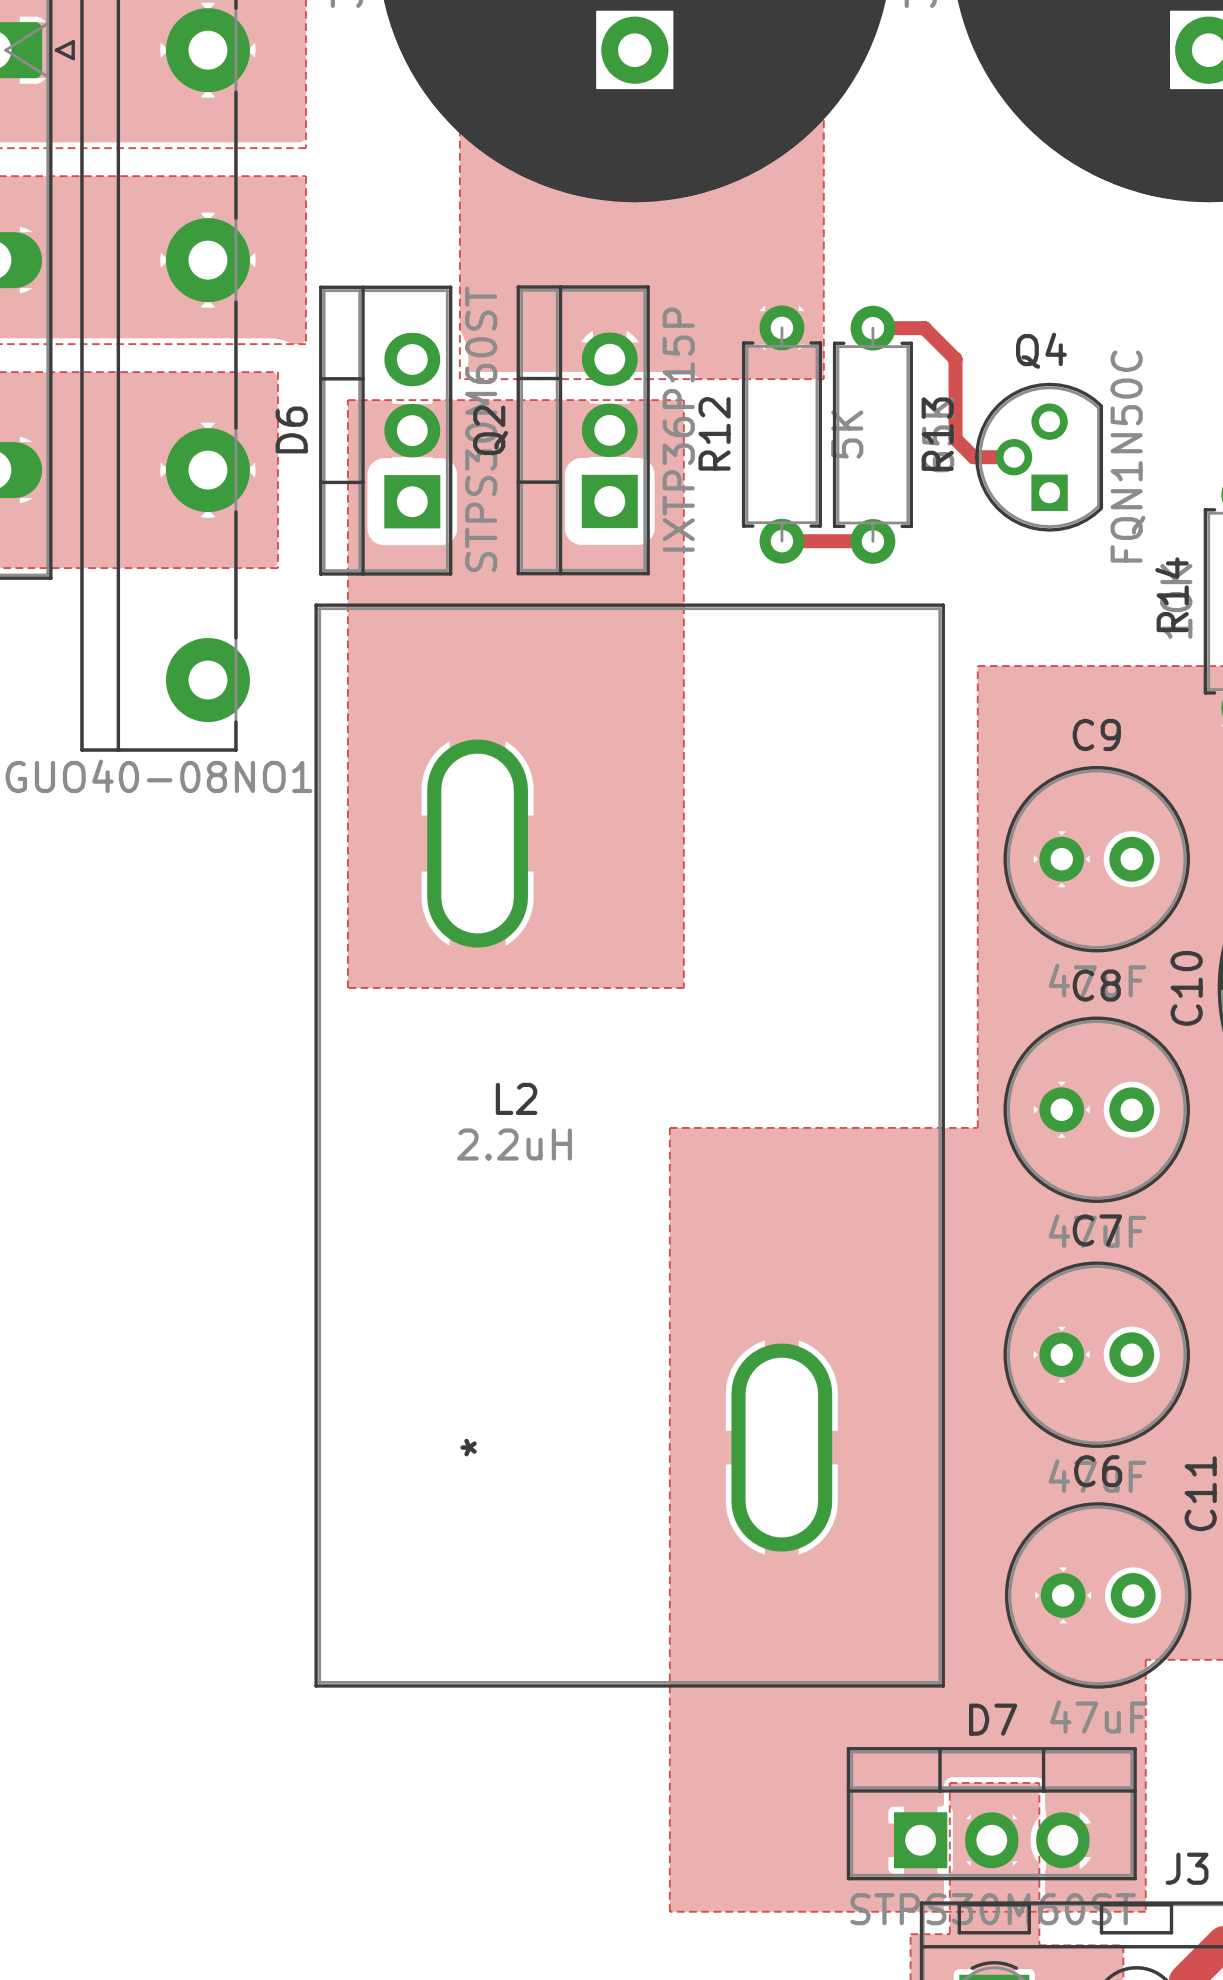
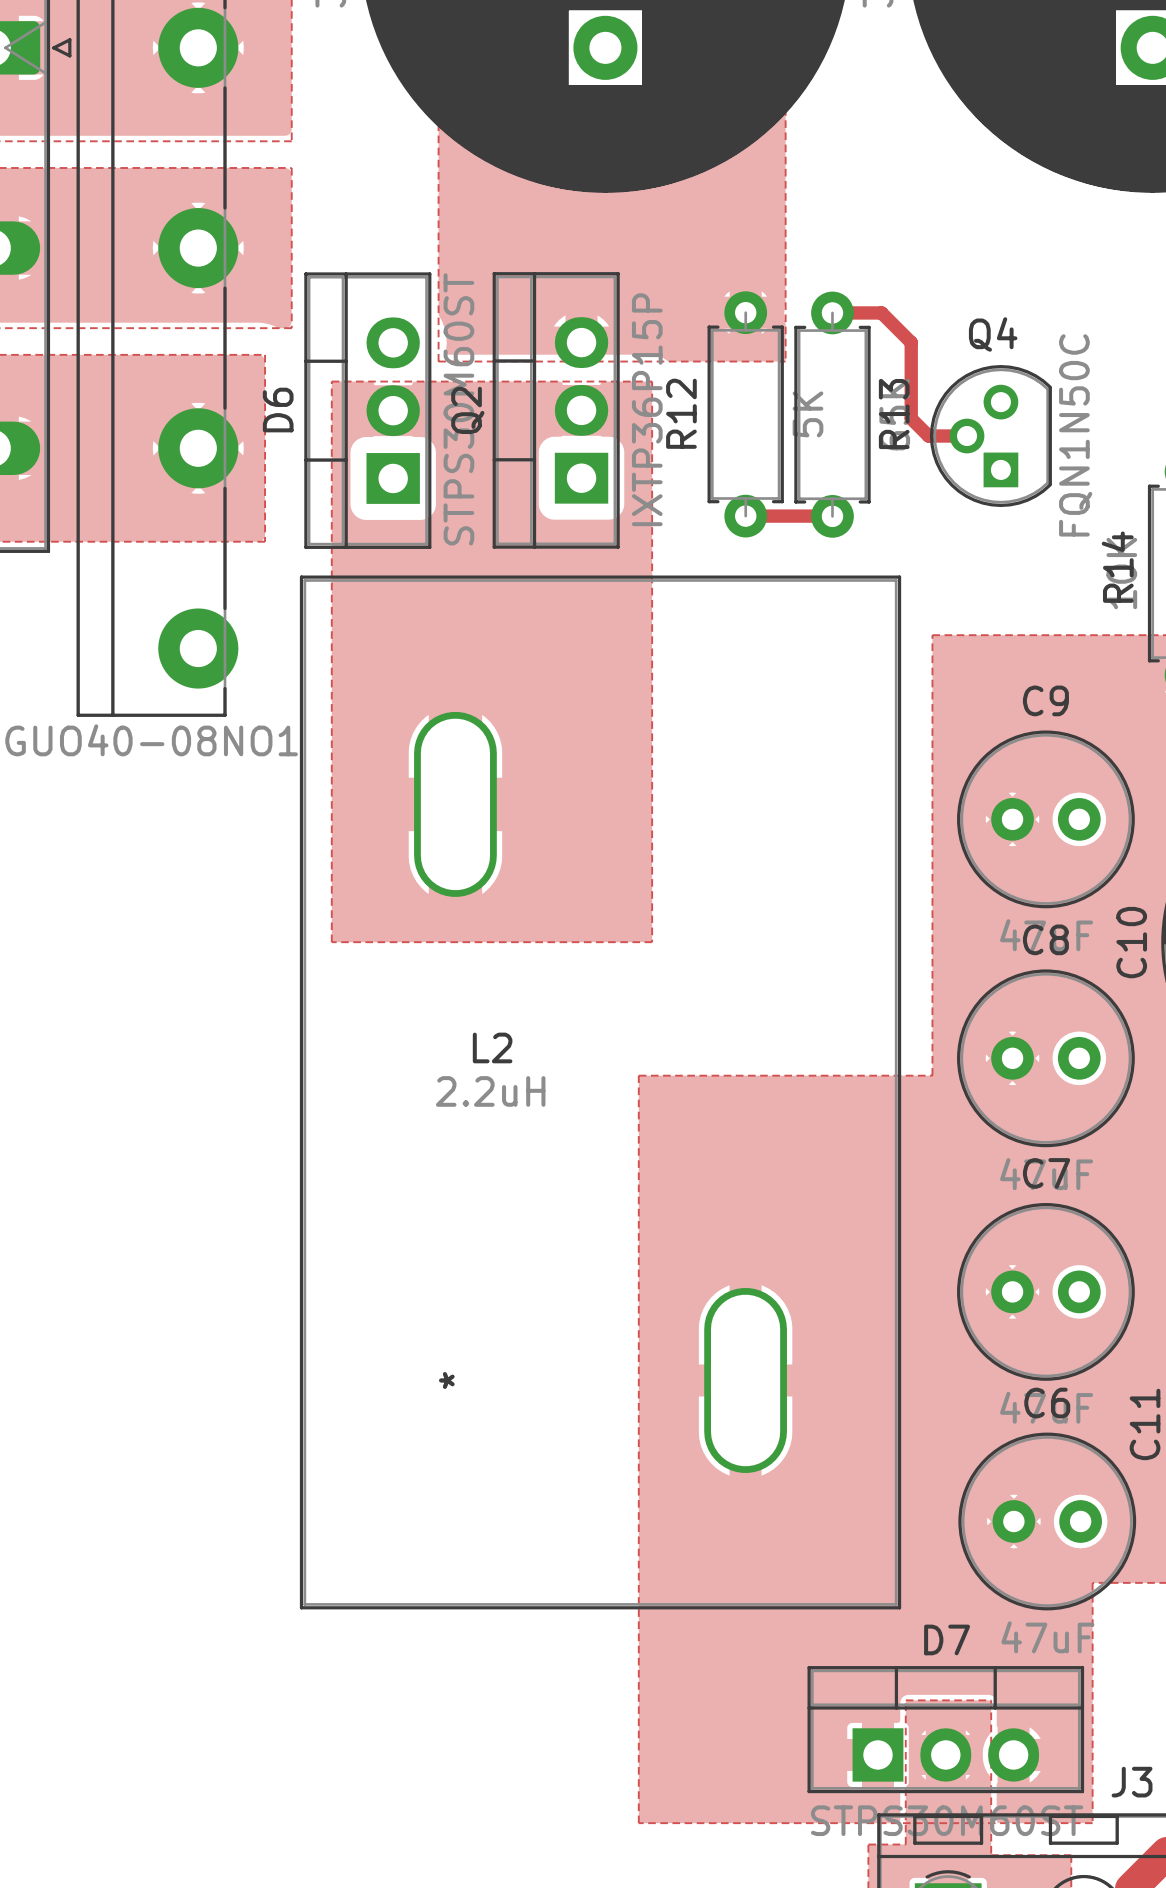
L2 footprint: [314, 603, 945, 1688] -> [299, 575, 902, 1610]

